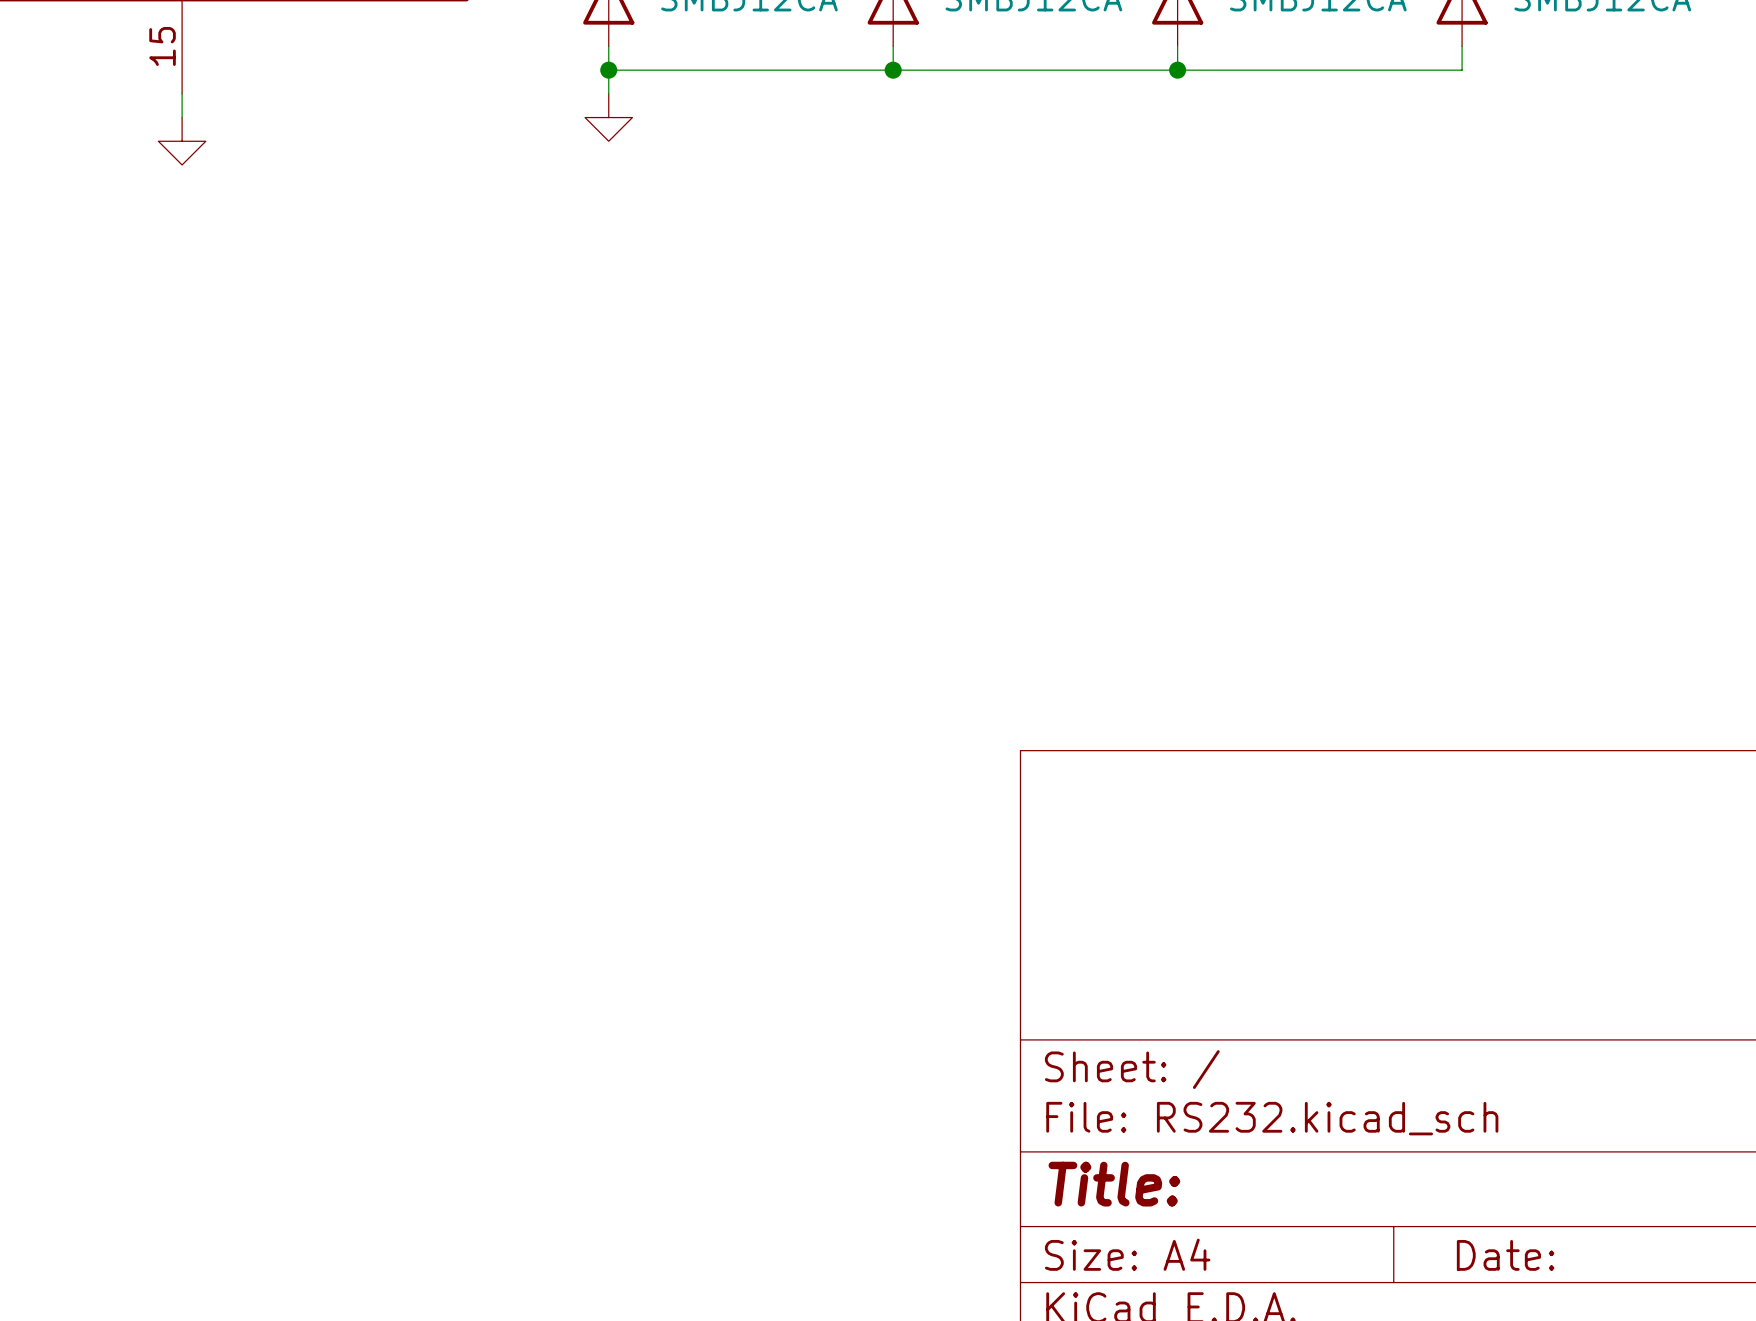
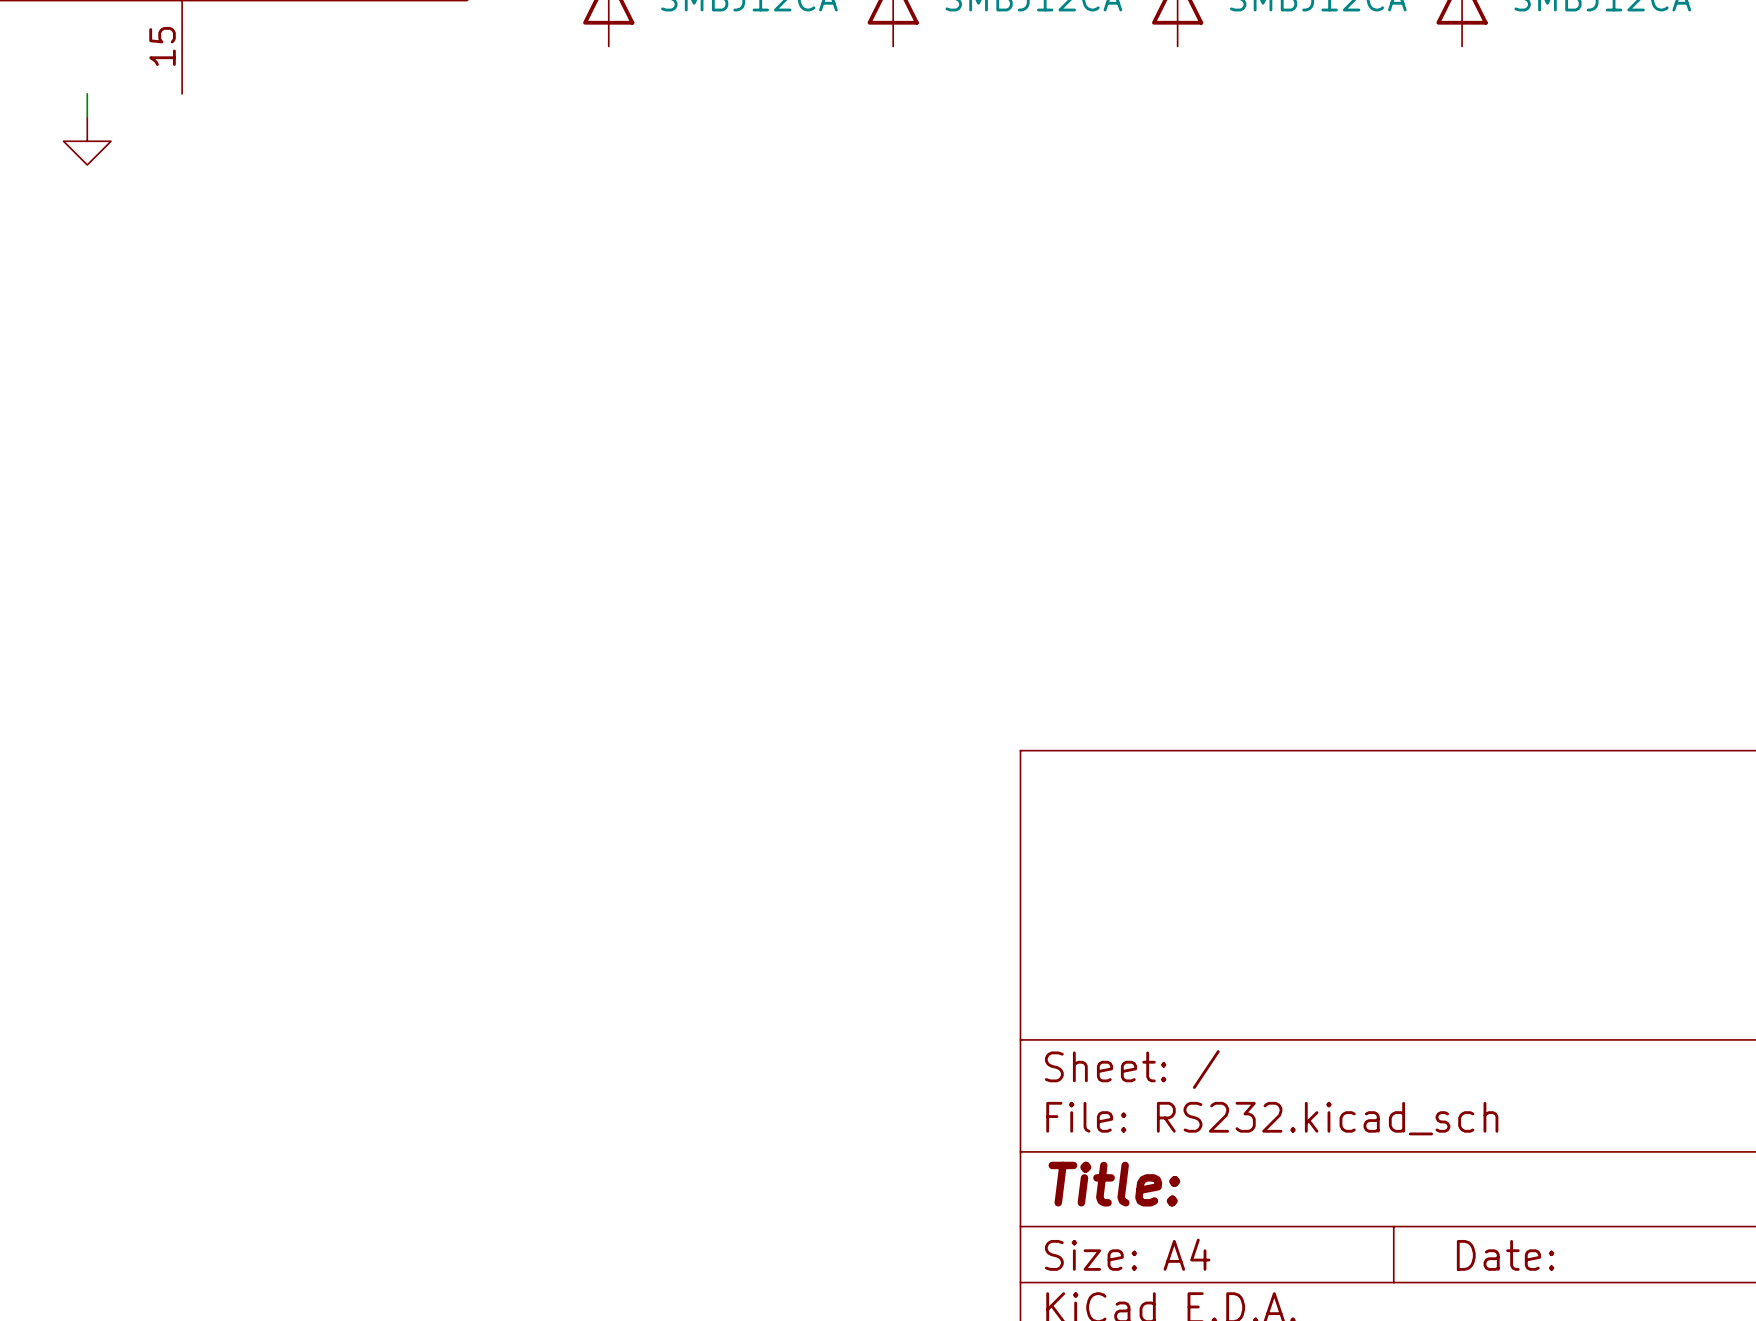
wire: (608, 46) (608, 93) -> none
wire: (893, 46) (893, 70) -> none
wire: (1177, 46) (1177, 70) -> none
wire: (1462, 46) (1462, 70) (608, 70) -> none
junction: (608, 70) -> none
junction: (893, 70) -> none
junction: (1177, 70) -> none
wire: (182, 93) (182, 117) -> (87, 93) (87, 117)
power symbol: (608, 117) -> none
power symbol position: (182, 141) -> (87, 141)

